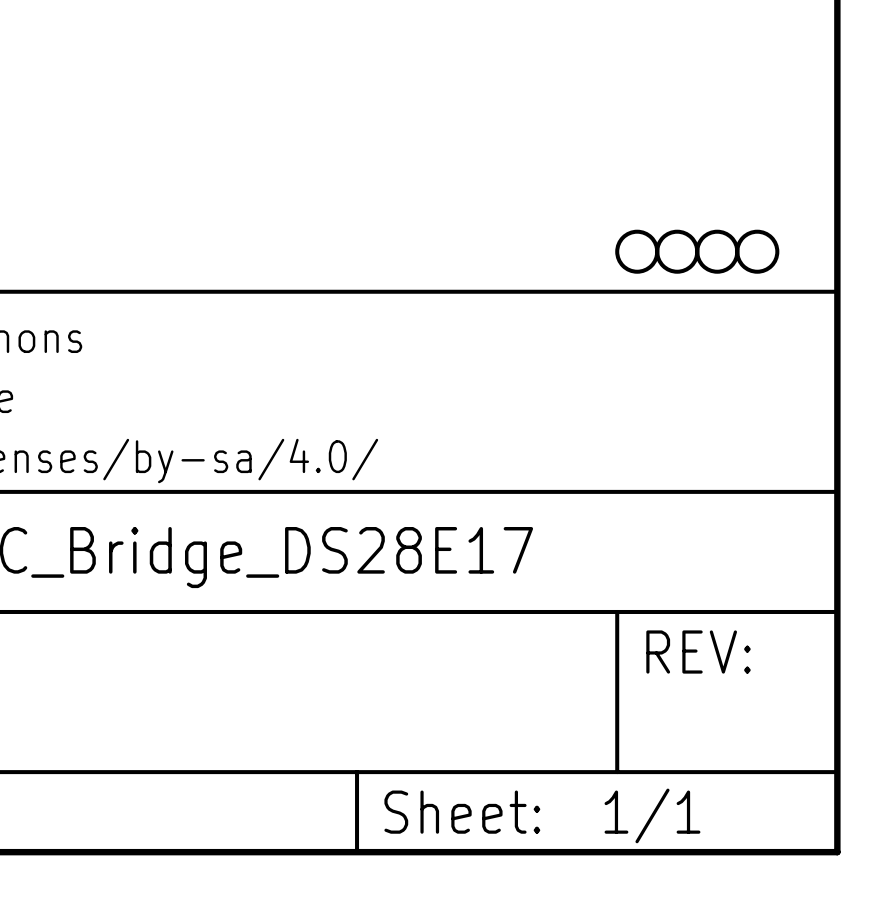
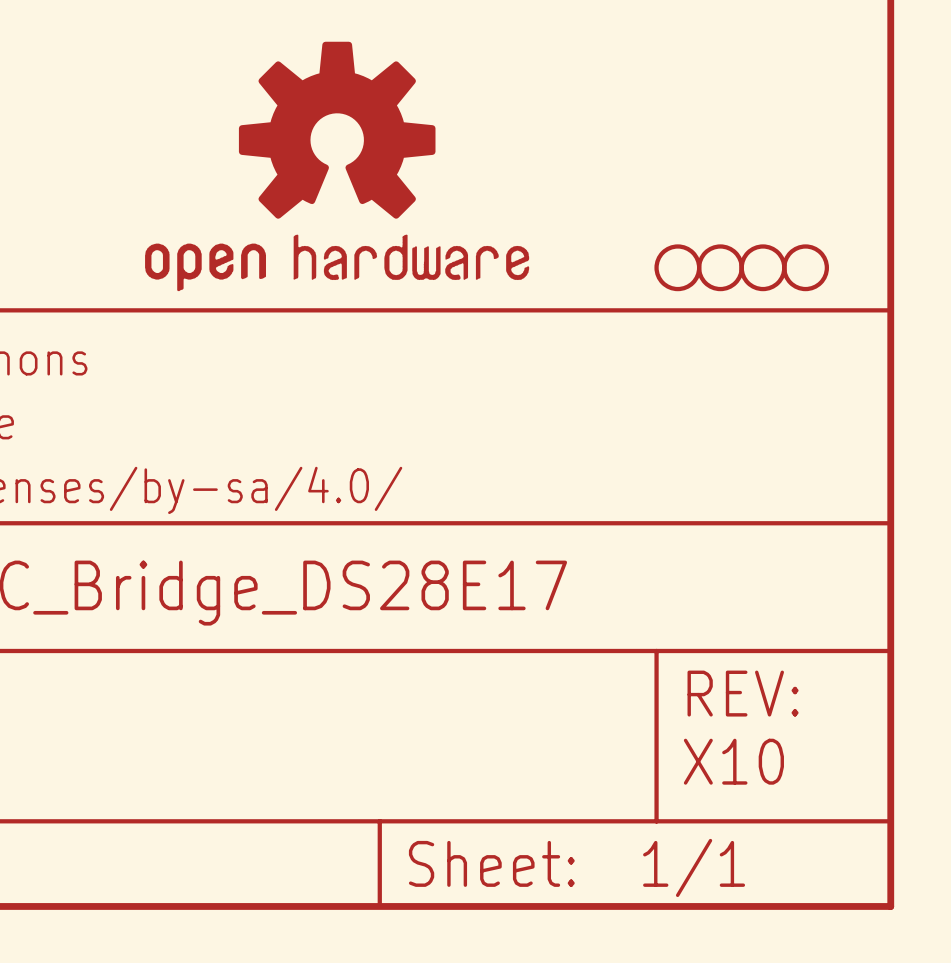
part: none -> (337, 166)
text: none -> X10 (733, 761)

